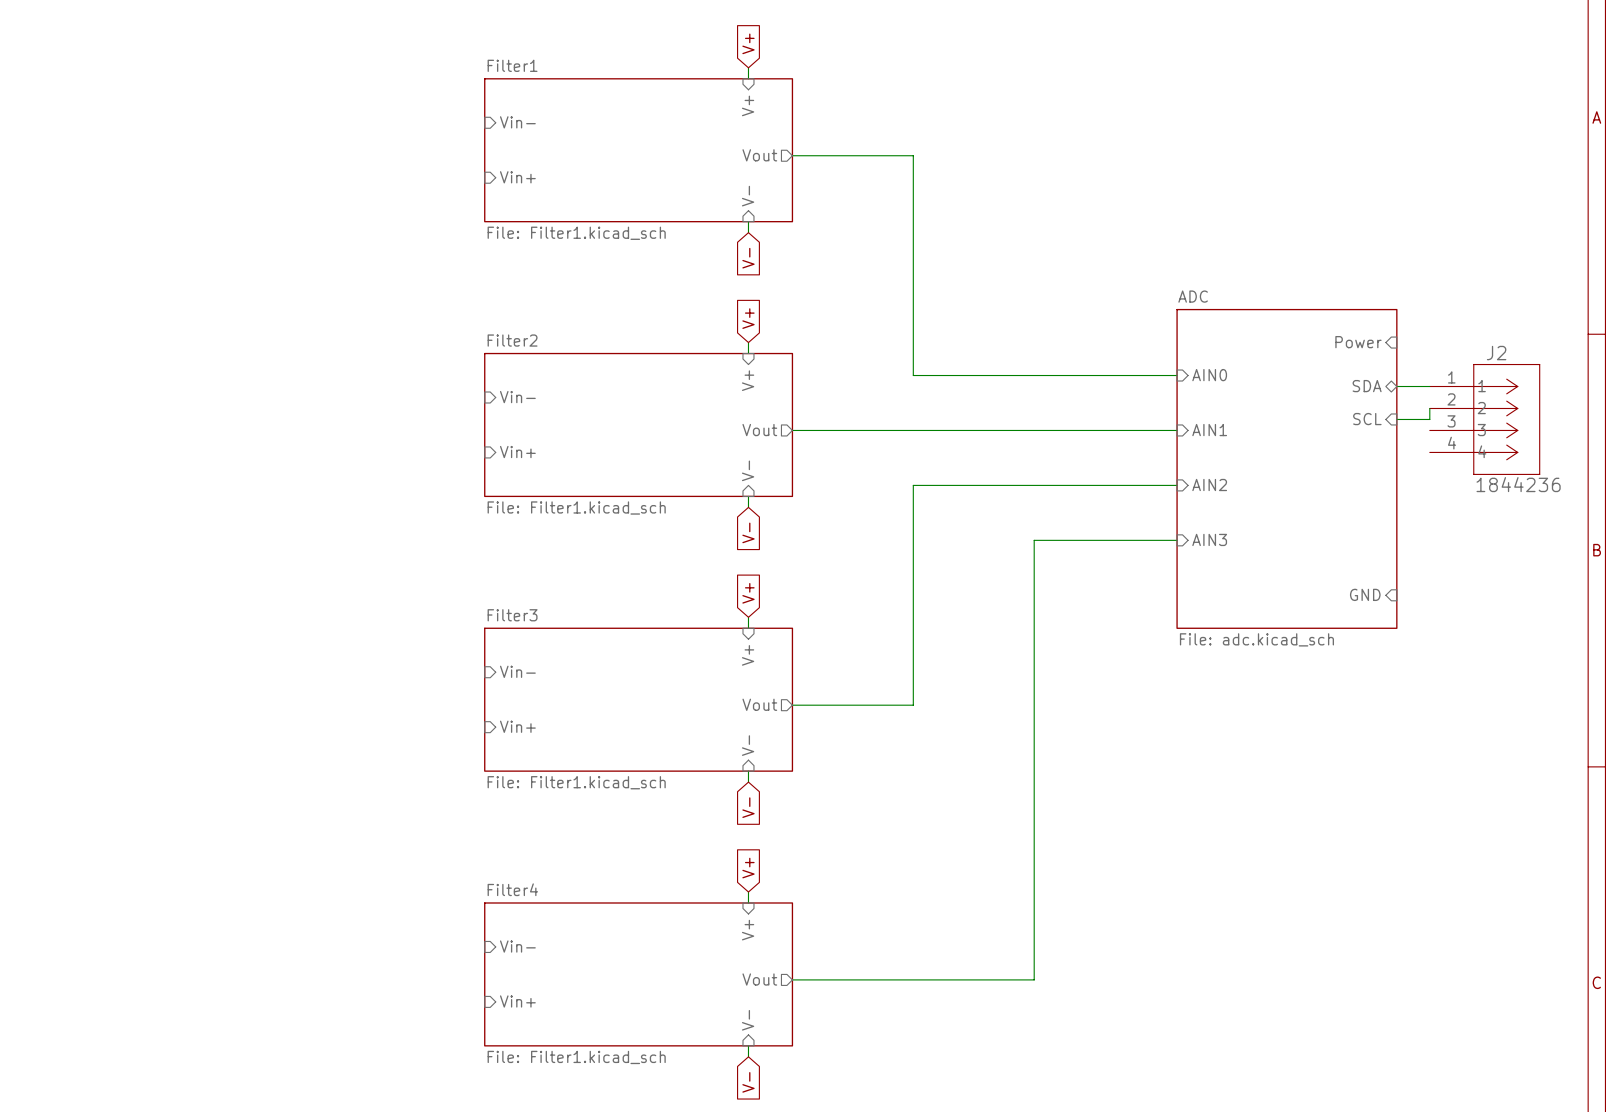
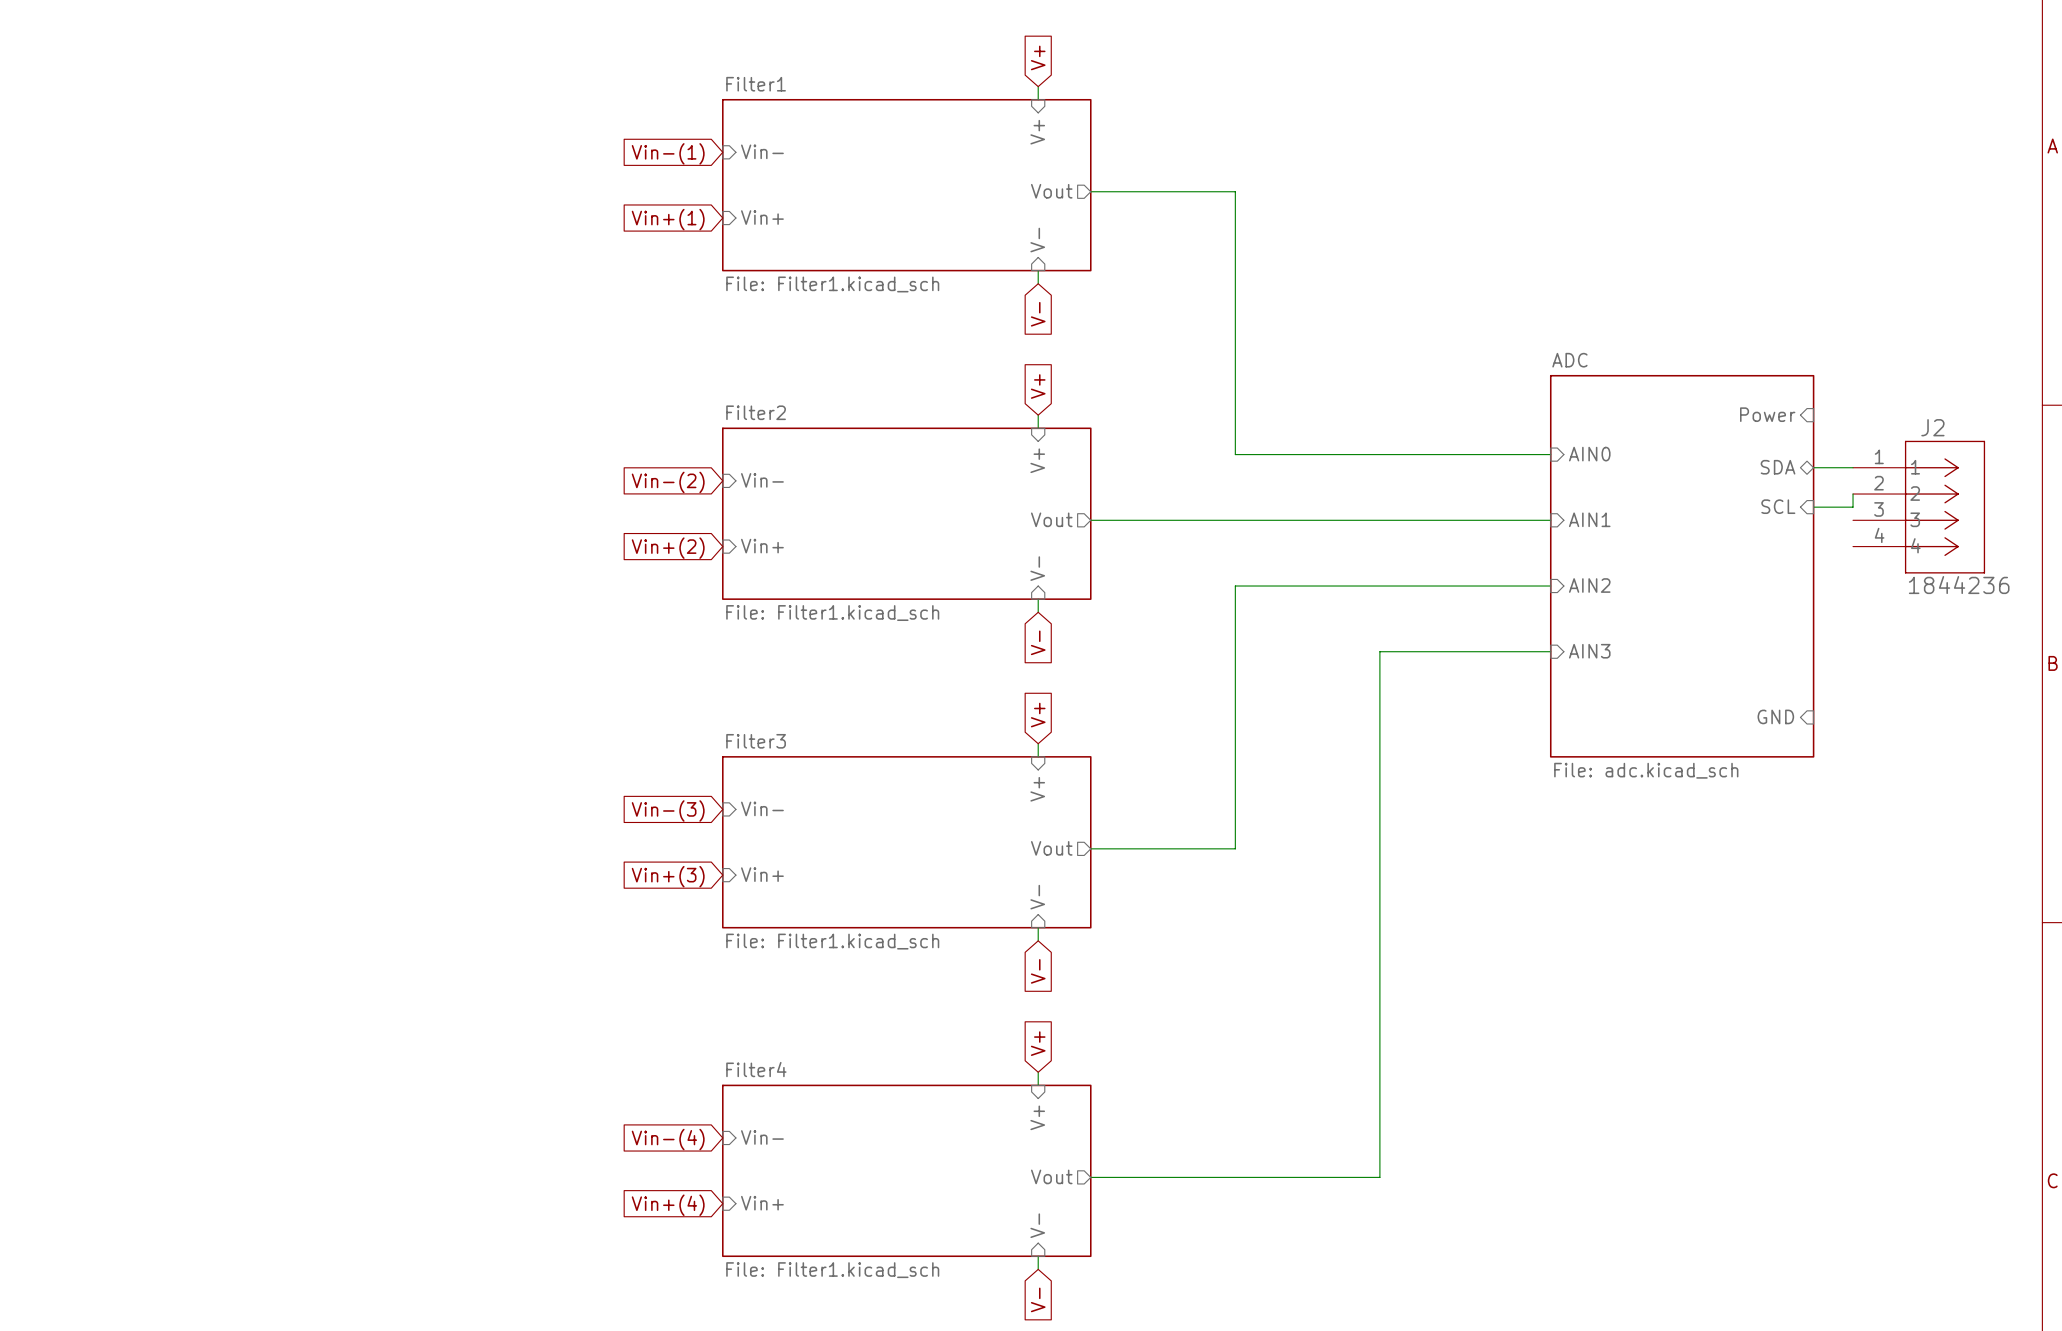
global label: none -> Vin-(1) (668, 153)
global label: none -> Vin+(1) (668, 219)
global label: none -> Vin-(2) (668, 482)
global label: none -> Vin+(2) (668, 548)
global label: none -> Vin-(3) (668, 810)
global label: none -> Vin+(3) (668, 876)
global label: none -> Vin-(4) (668, 1139)
global label: none -> Vin+(4) (668, 1205)

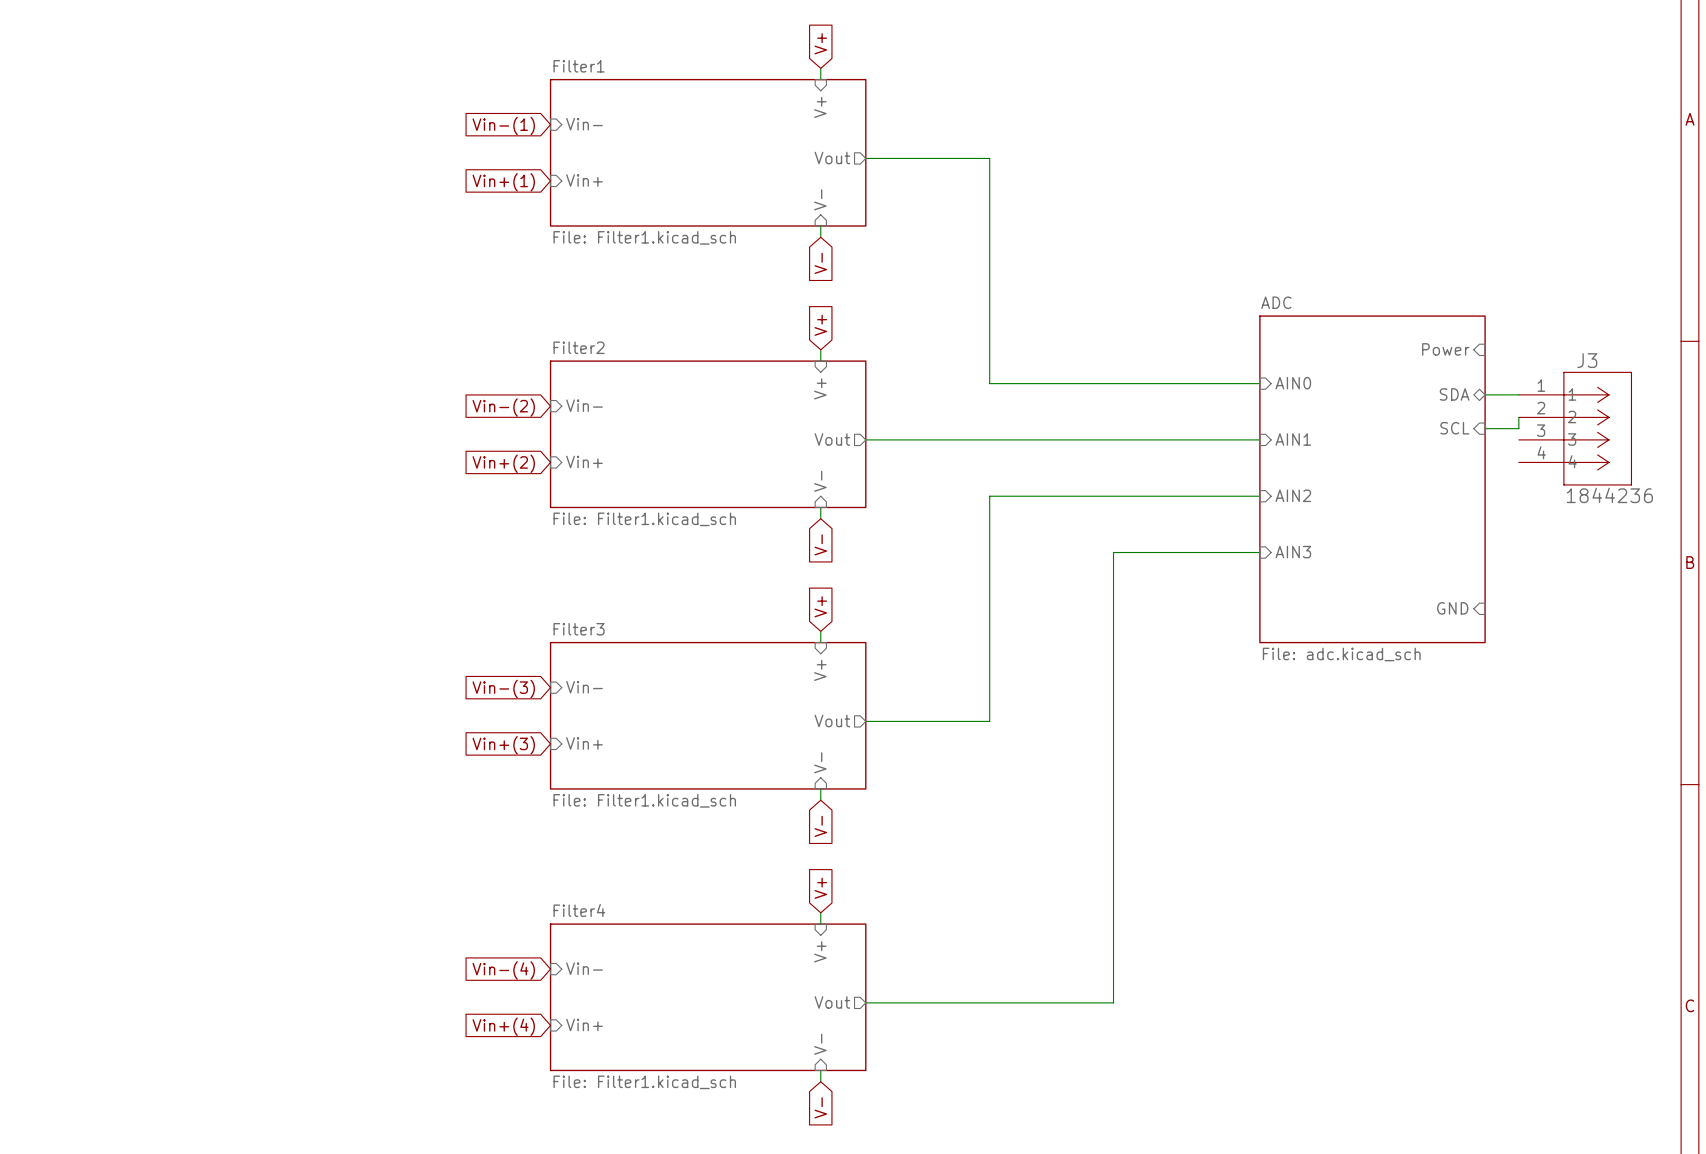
J2 name: J2 (1932, 427) -> J3 (1587, 360)

